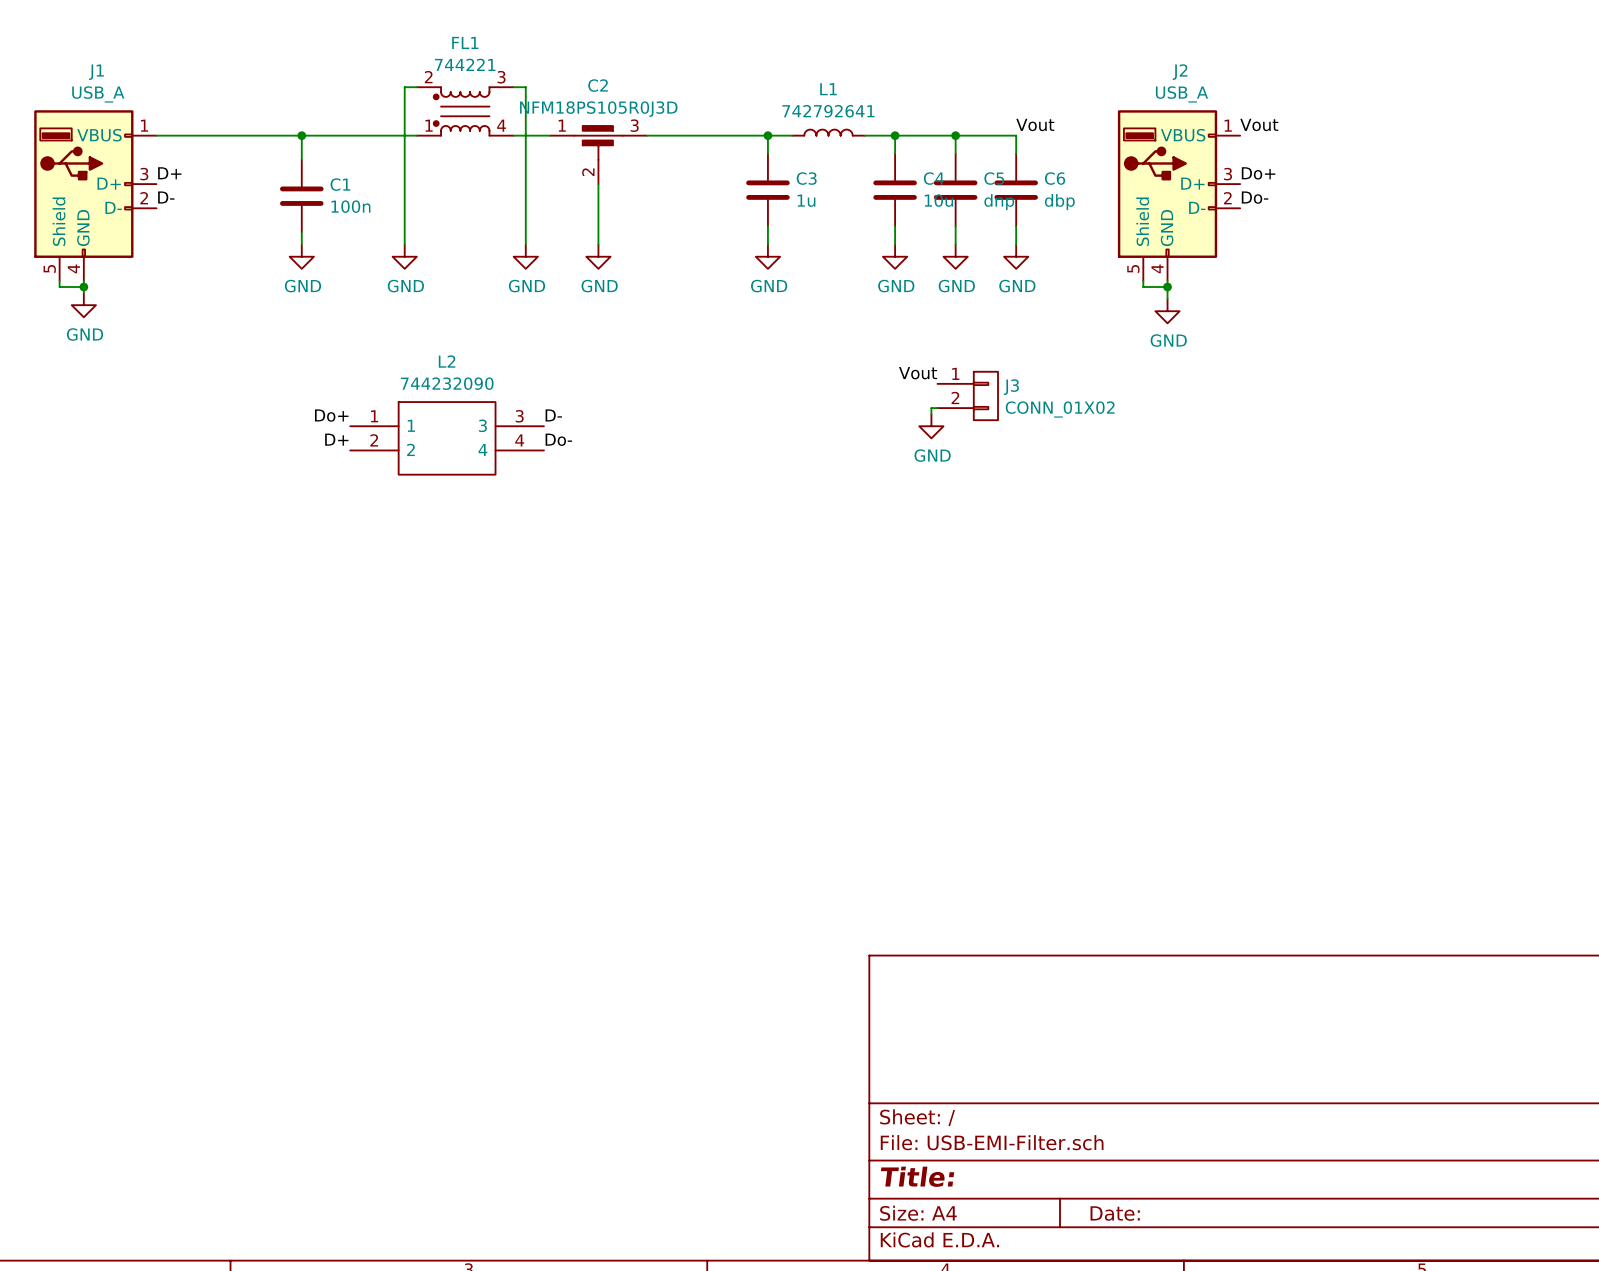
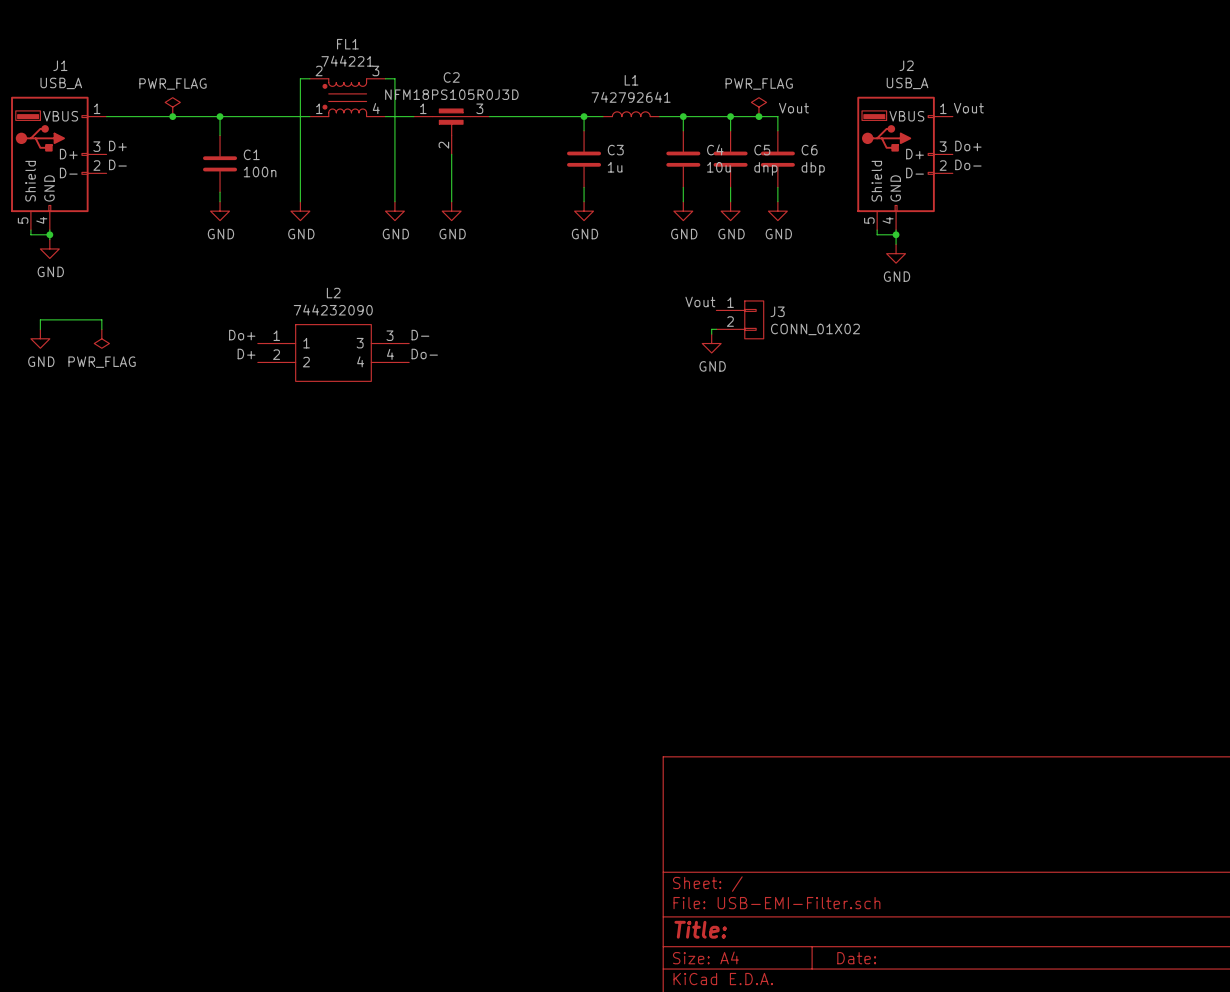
power symbol: none -> PWR_FLAG (172, 107)
power symbol: none -> PWR_FLAG (758, 107)
junction: none -> (172, 116)
junction: none -> (758, 116)
wire: none -> (40, 329) (40, 319) (101, 319) (101, 329)
power symbol: none -> GND (40, 338)
power symbol: none -> PWR_FLAG (101, 338)

